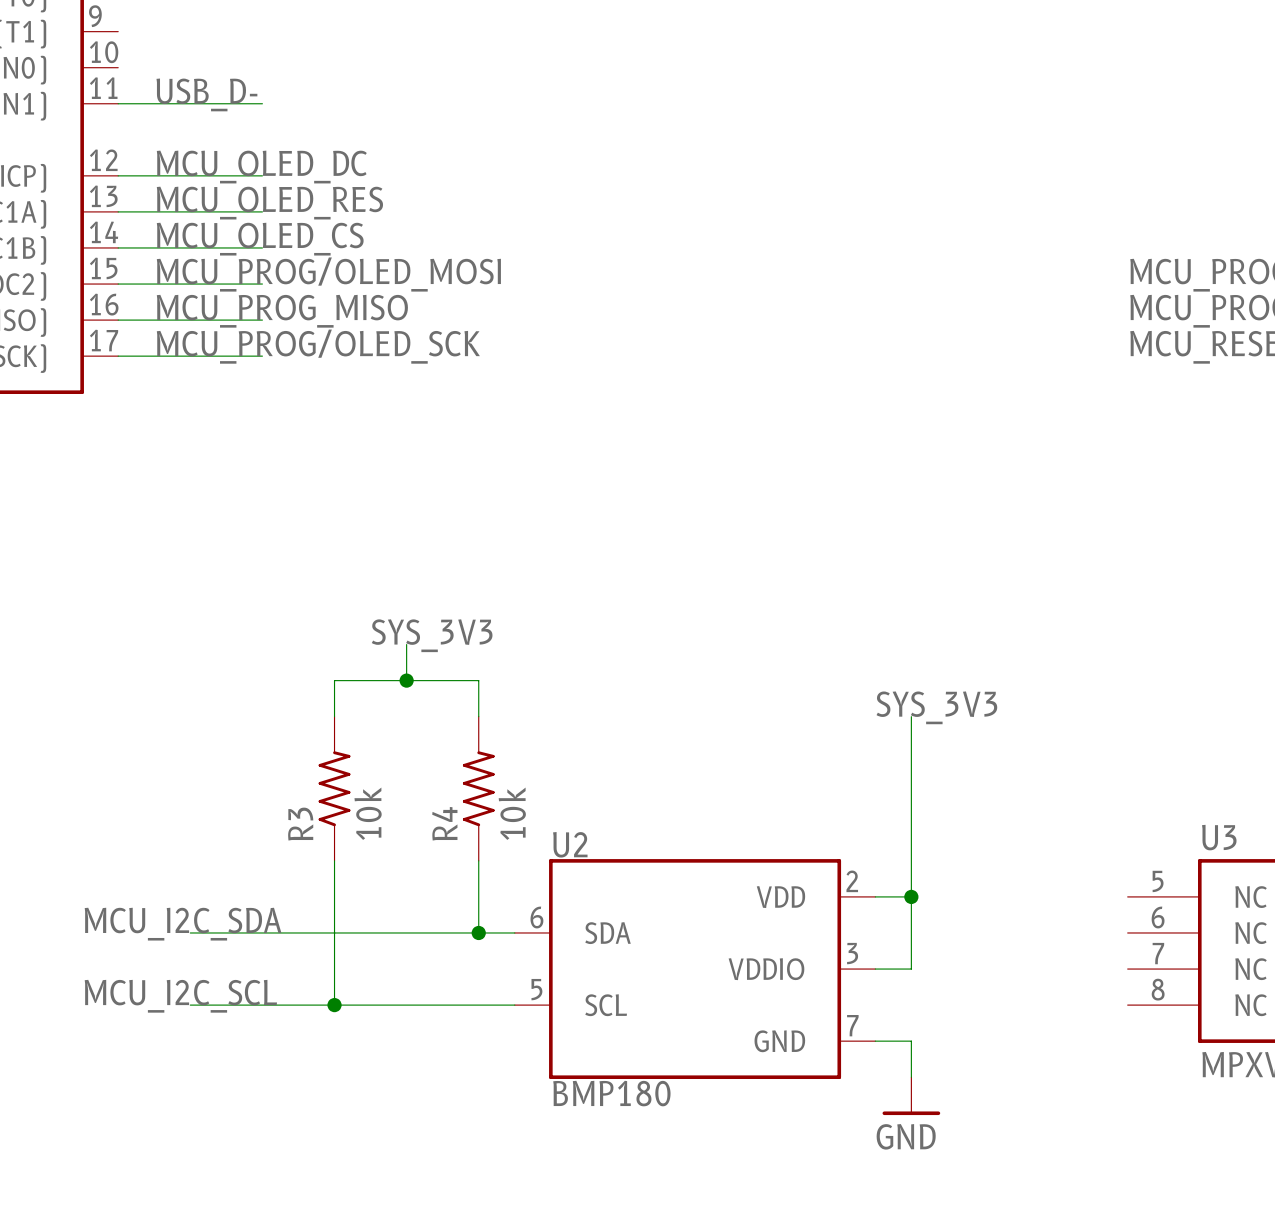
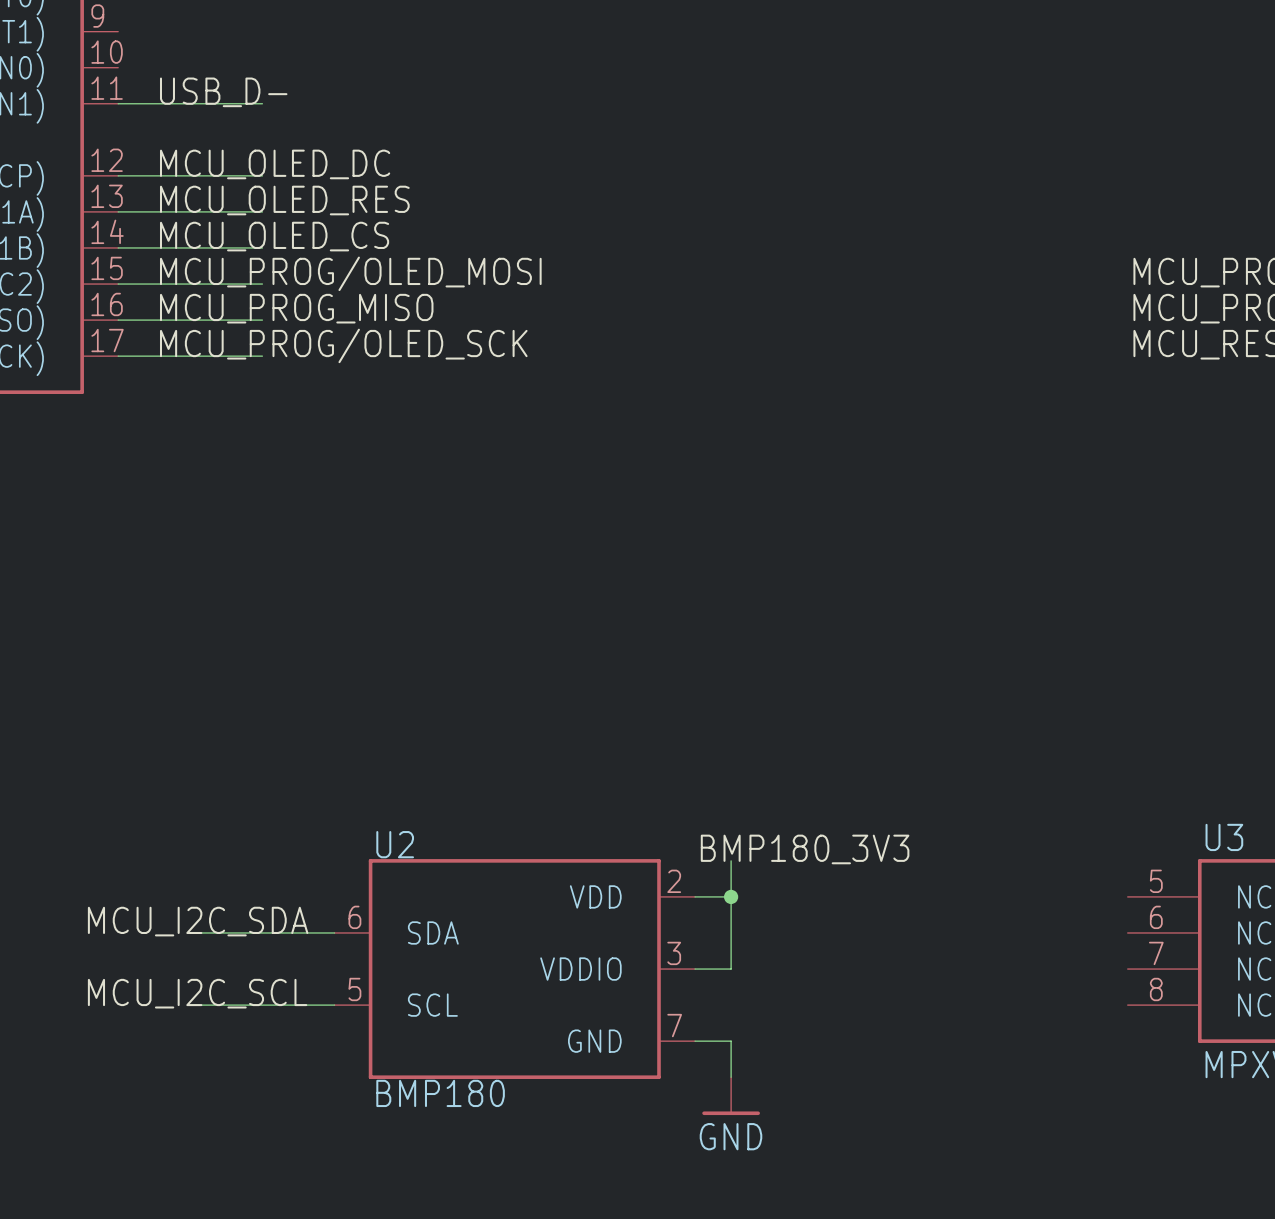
label: SYS_3V3 (432, 635) -> none
wire: (406, 644) (406, 680) -> none
junction: (406, 680) -> none
label: SYS_3V3 (936, 707) -> none
wire: (334, 716) (334, 680) (478, 680) (478, 716) -> none
wire: (911, 716) (911, 969) (875, 969) -> none
R3: 10k (334, 788) -> none
R4: 10k (478, 788) -> none
label: none -> BMP180_3V3 (805, 849)
wire: (334, 860) (334, 1005) (514, 1005) -> none
wire: (478, 860) (478, 932) -> none
wire: none -> (731, 860) (731, 969) (695, 969)
junction: none -> (731, 896)
wire: (875, 896) (911, 896) -> (695, 896) (731, 896)
junction: (911, 896) -> none
wire: (334, 932) (514, 932) -> none
junction: (478, 932) -> none
U2 position: (695, 969) -> (514, 969)
junction: (334, 1005) -> none
wire: (875, 1041) (911, 1041) (911, 1077) -> (695, 1041) (731, 1041) (731, 1077)
power symbol position: GND (911, 1096) -> GND (731, 1096)

